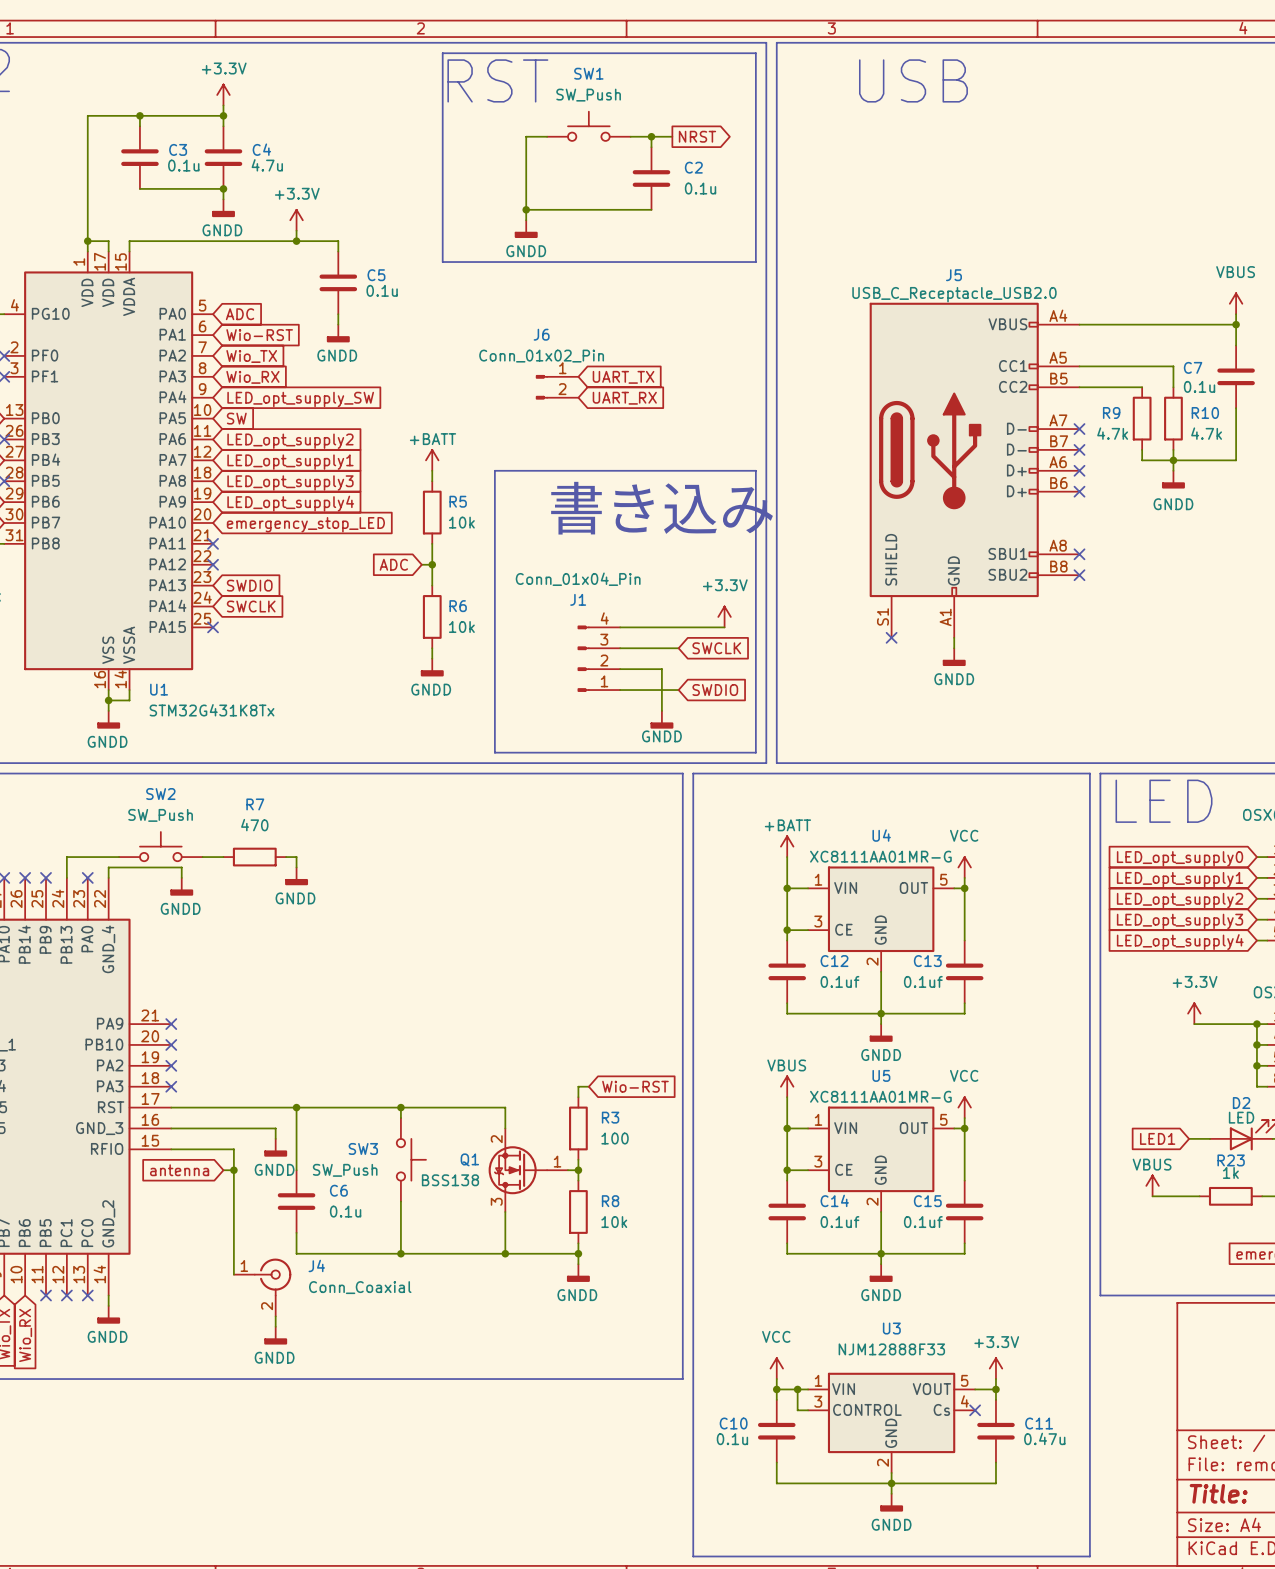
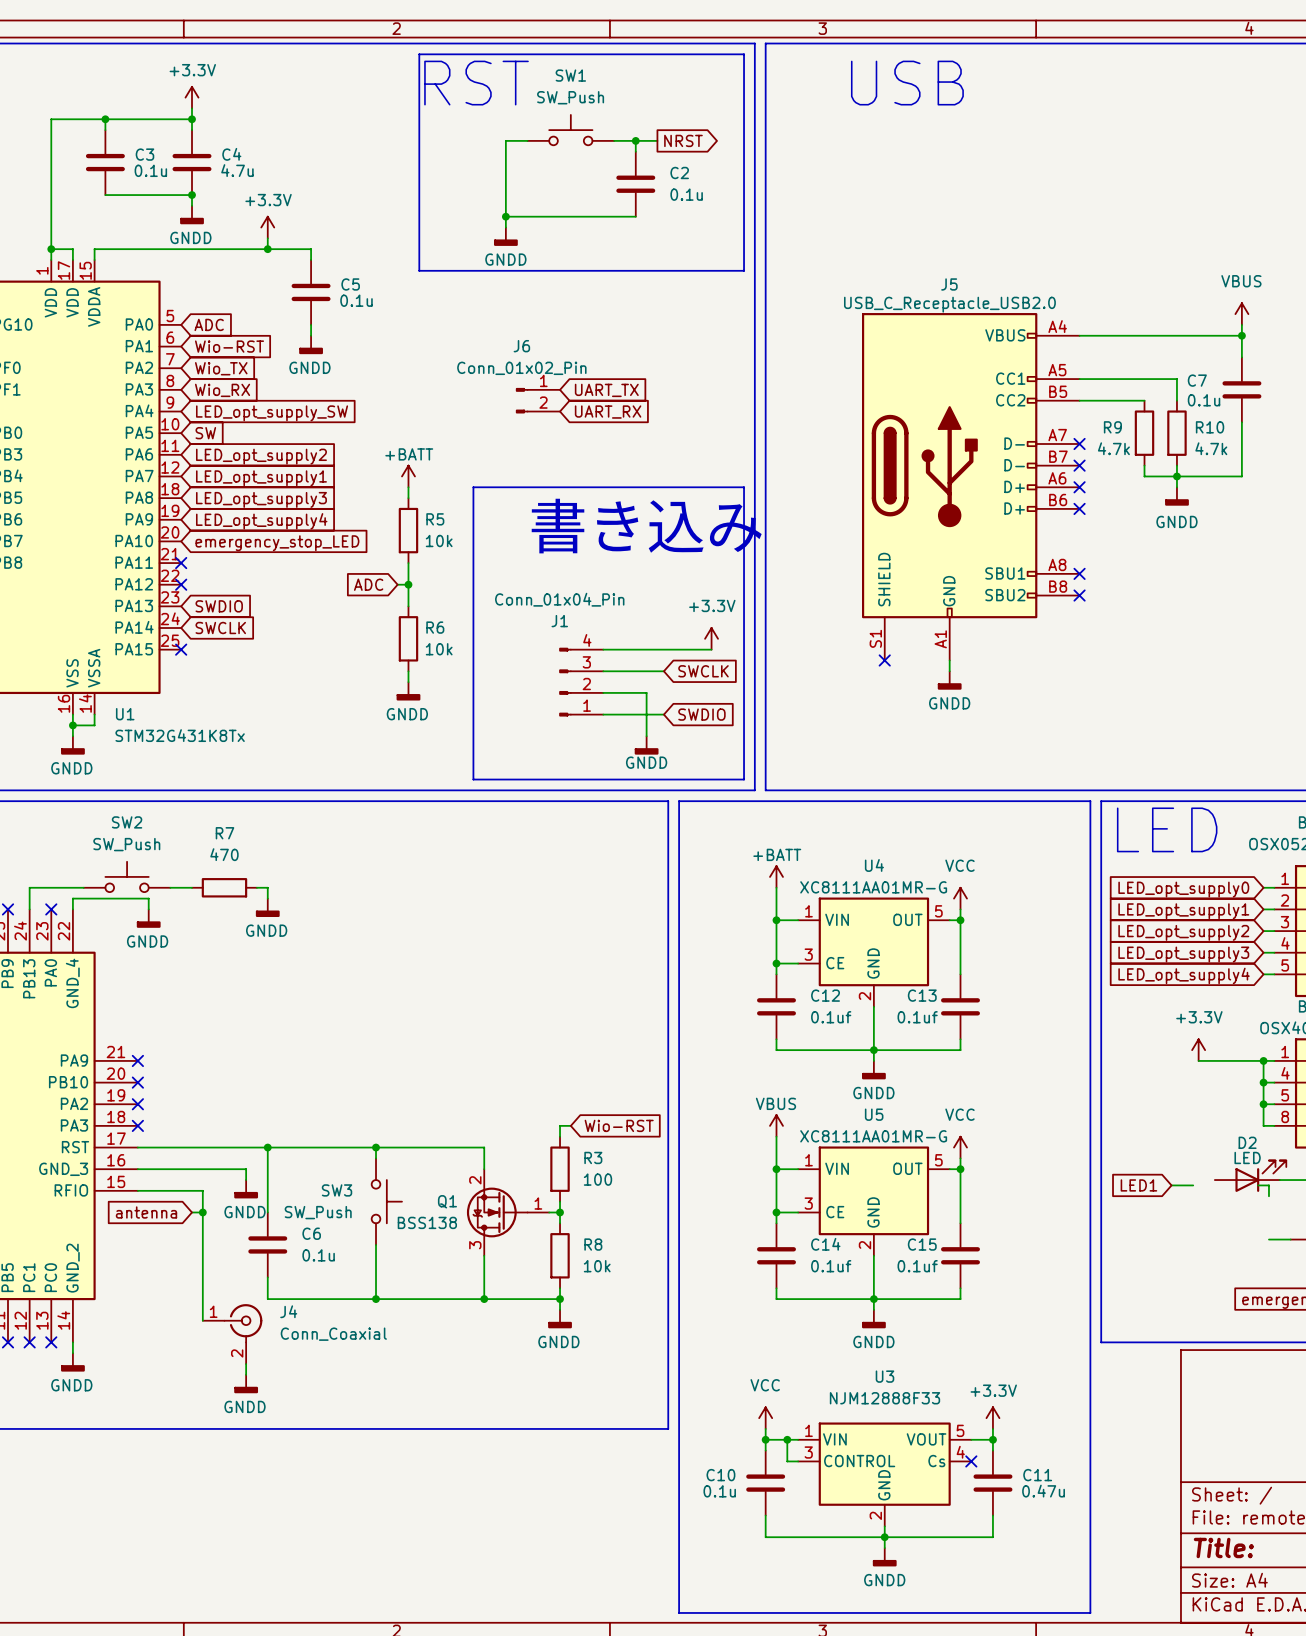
global label position: LED1 (1157, 1138) -> LED1 (1138, 1185)
wire: (1189, 1138) (1209, 1138) -> (1171, 1185) (1193, 1185)
wire: none -> (1258, 1185) (1268, 1185) (1268, 1196)
power symbol: VBUS (1152, 1185) -> none
wire: (1152, 1196) (1199, 1196) -> none
R23: 1k (1230, 1196) -> none

